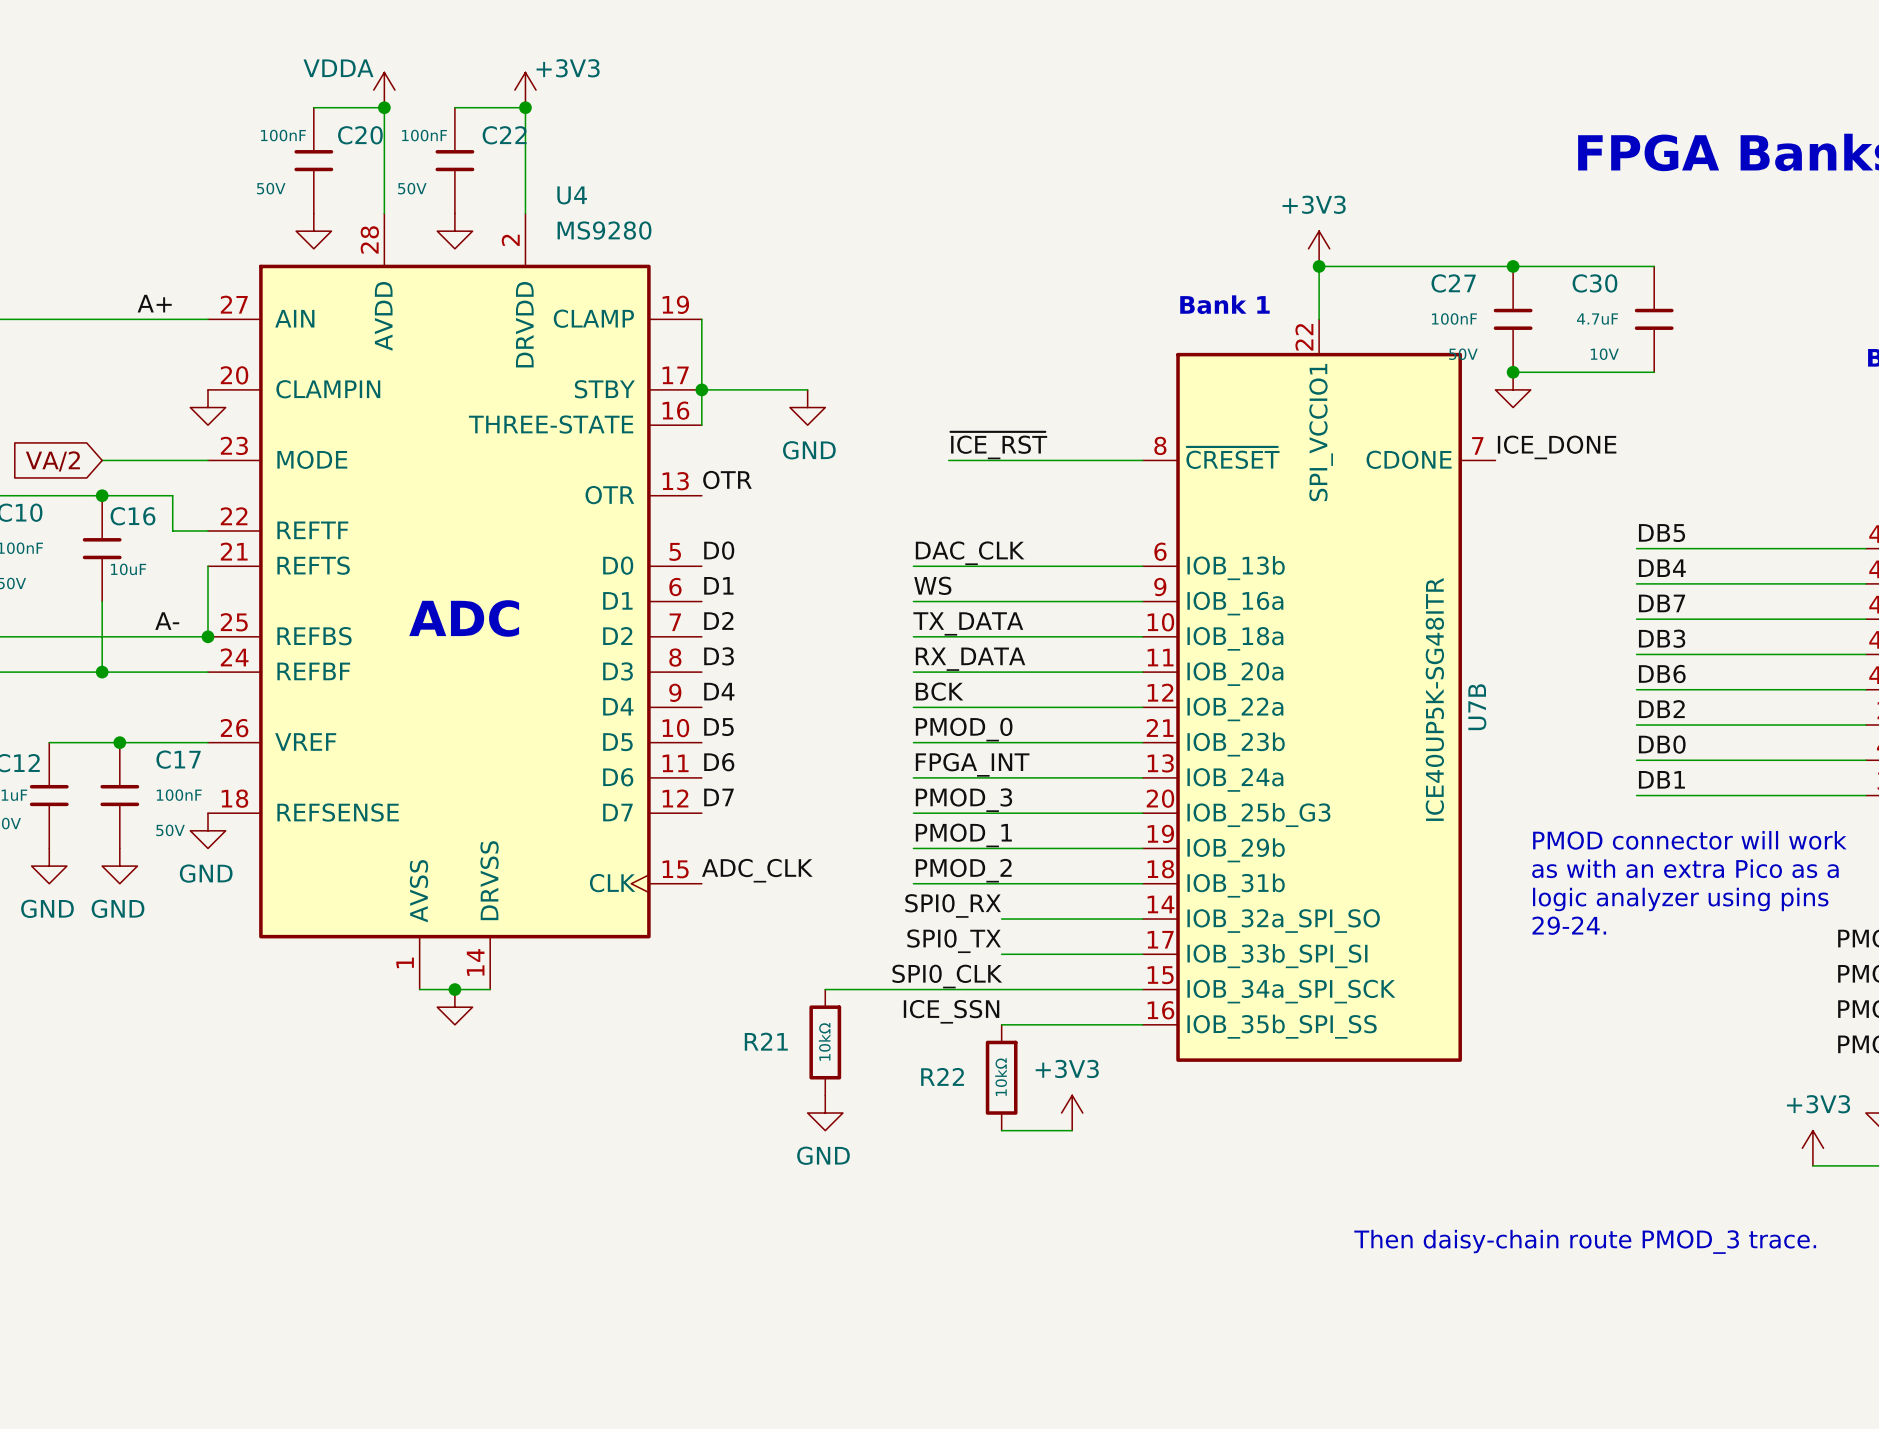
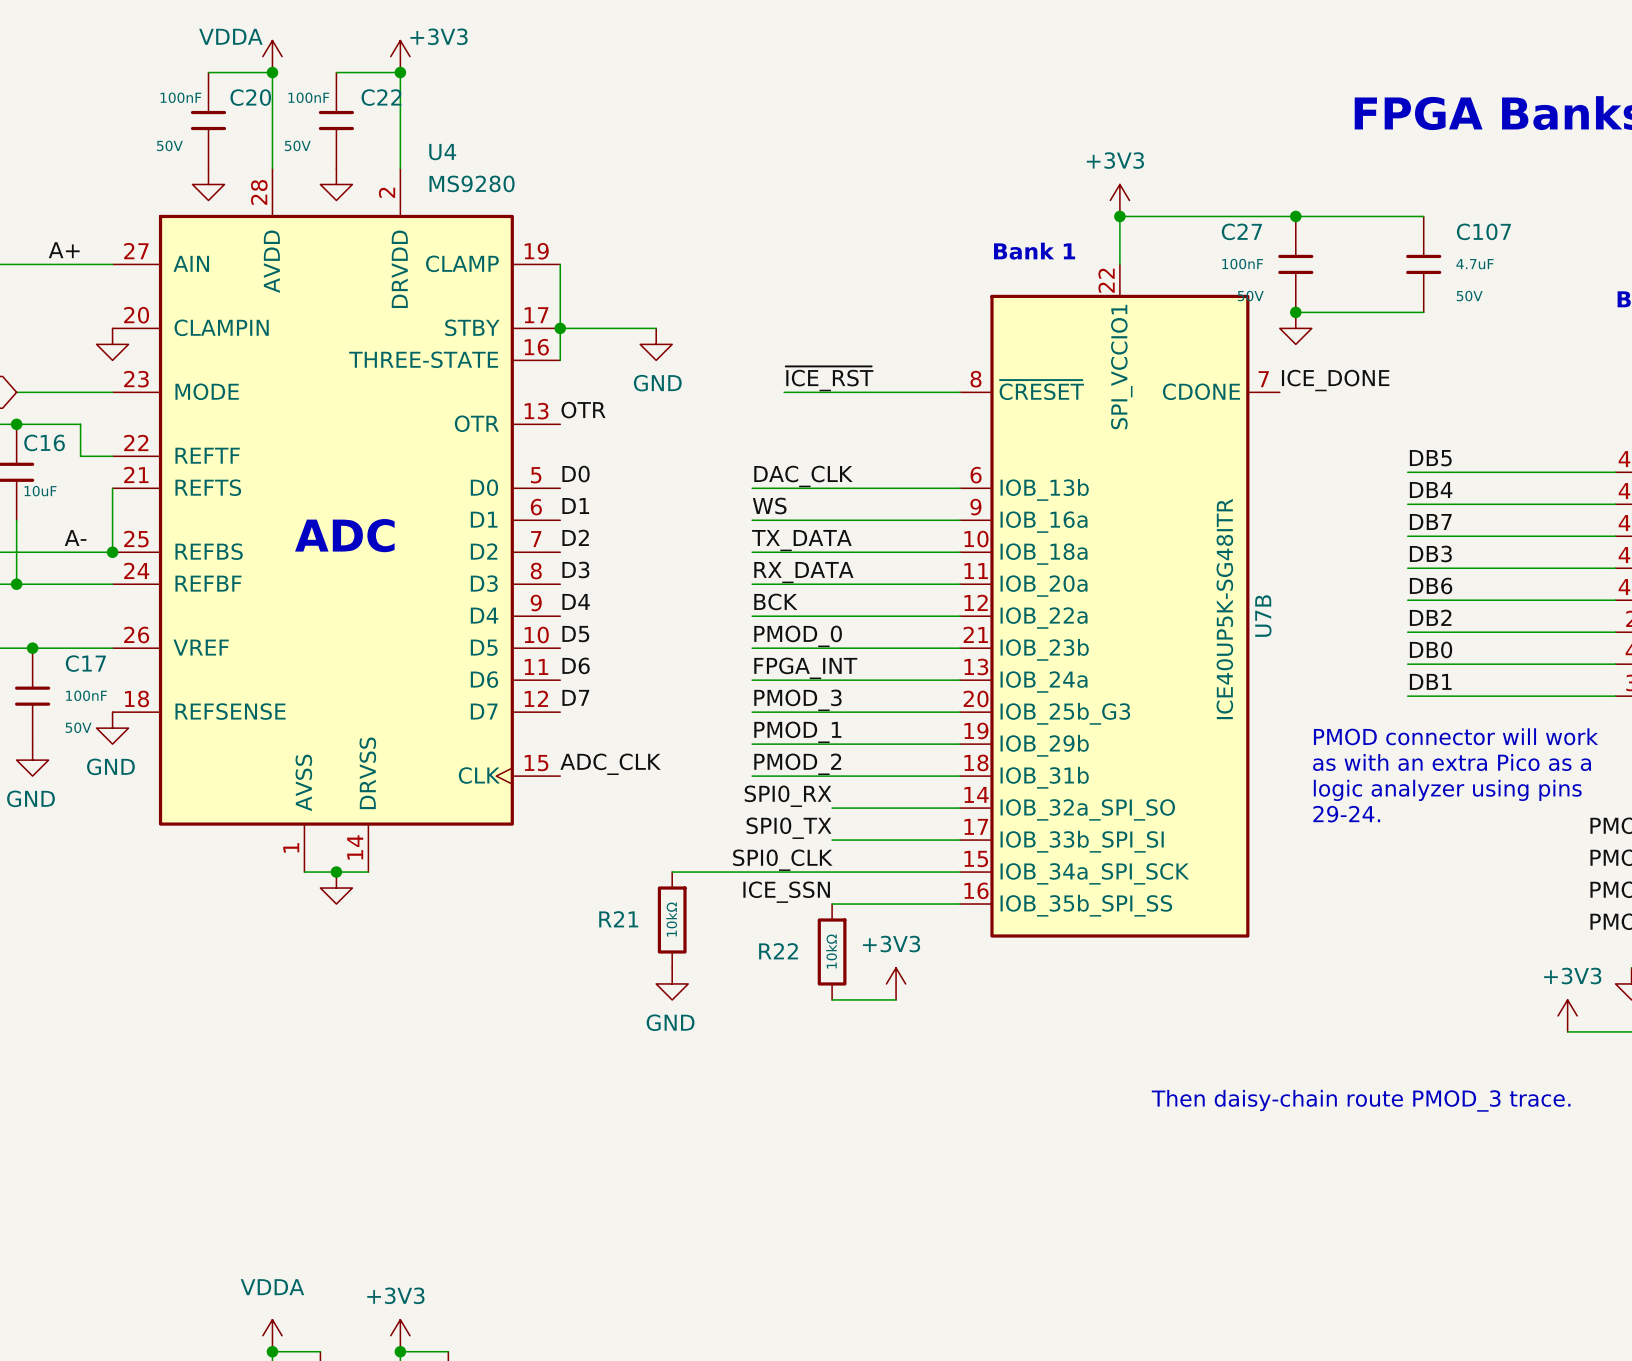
C30 name: C30 (1594, 283) -> C107 (1483, 231)
C30 value position: 4.7uF (1597, 319) -> 4.7uF (1474, 264)
C30 text: 10V (1604, 354) -> 50V (1469, 296)

